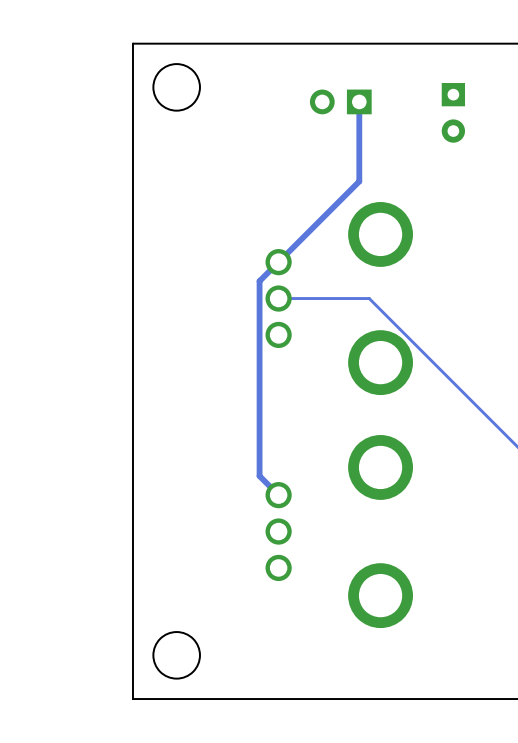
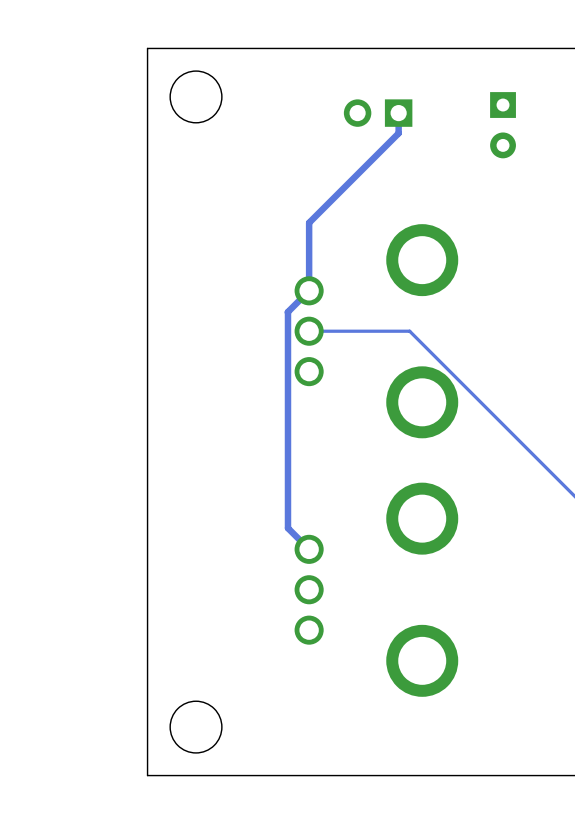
track: (359, 120) (359, 181) (278, 262) -> (398, 133) (309, 222) (309, 290)

